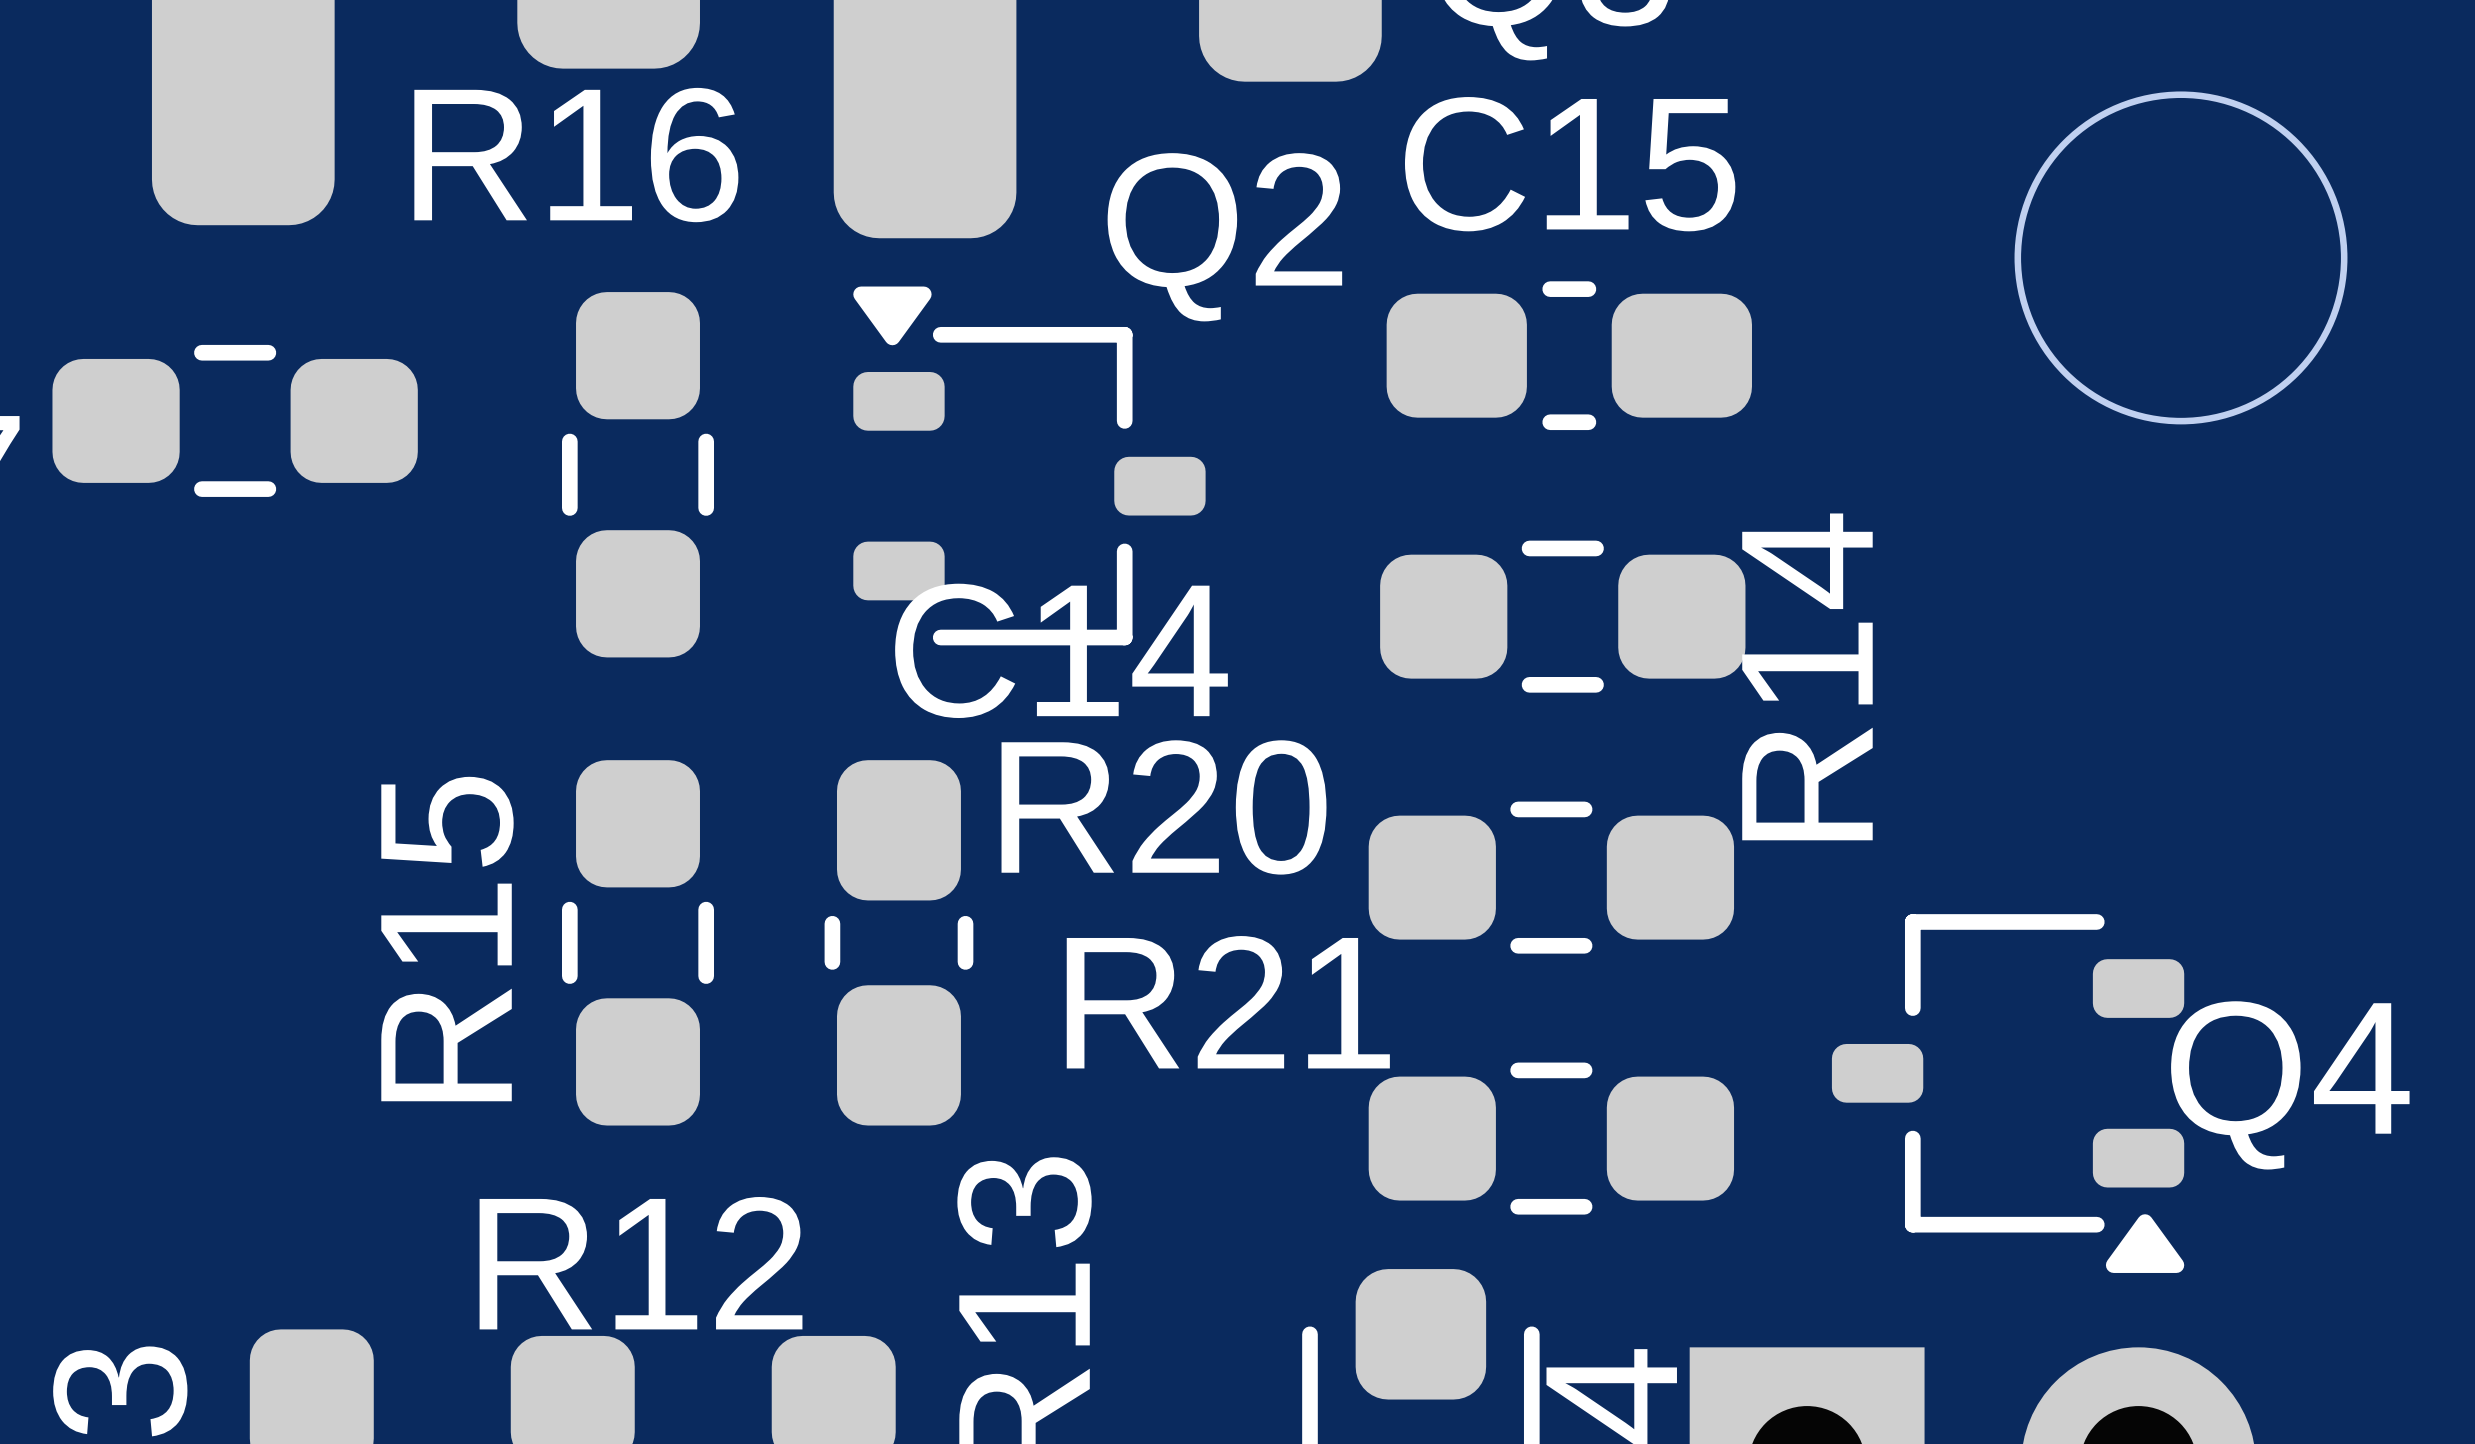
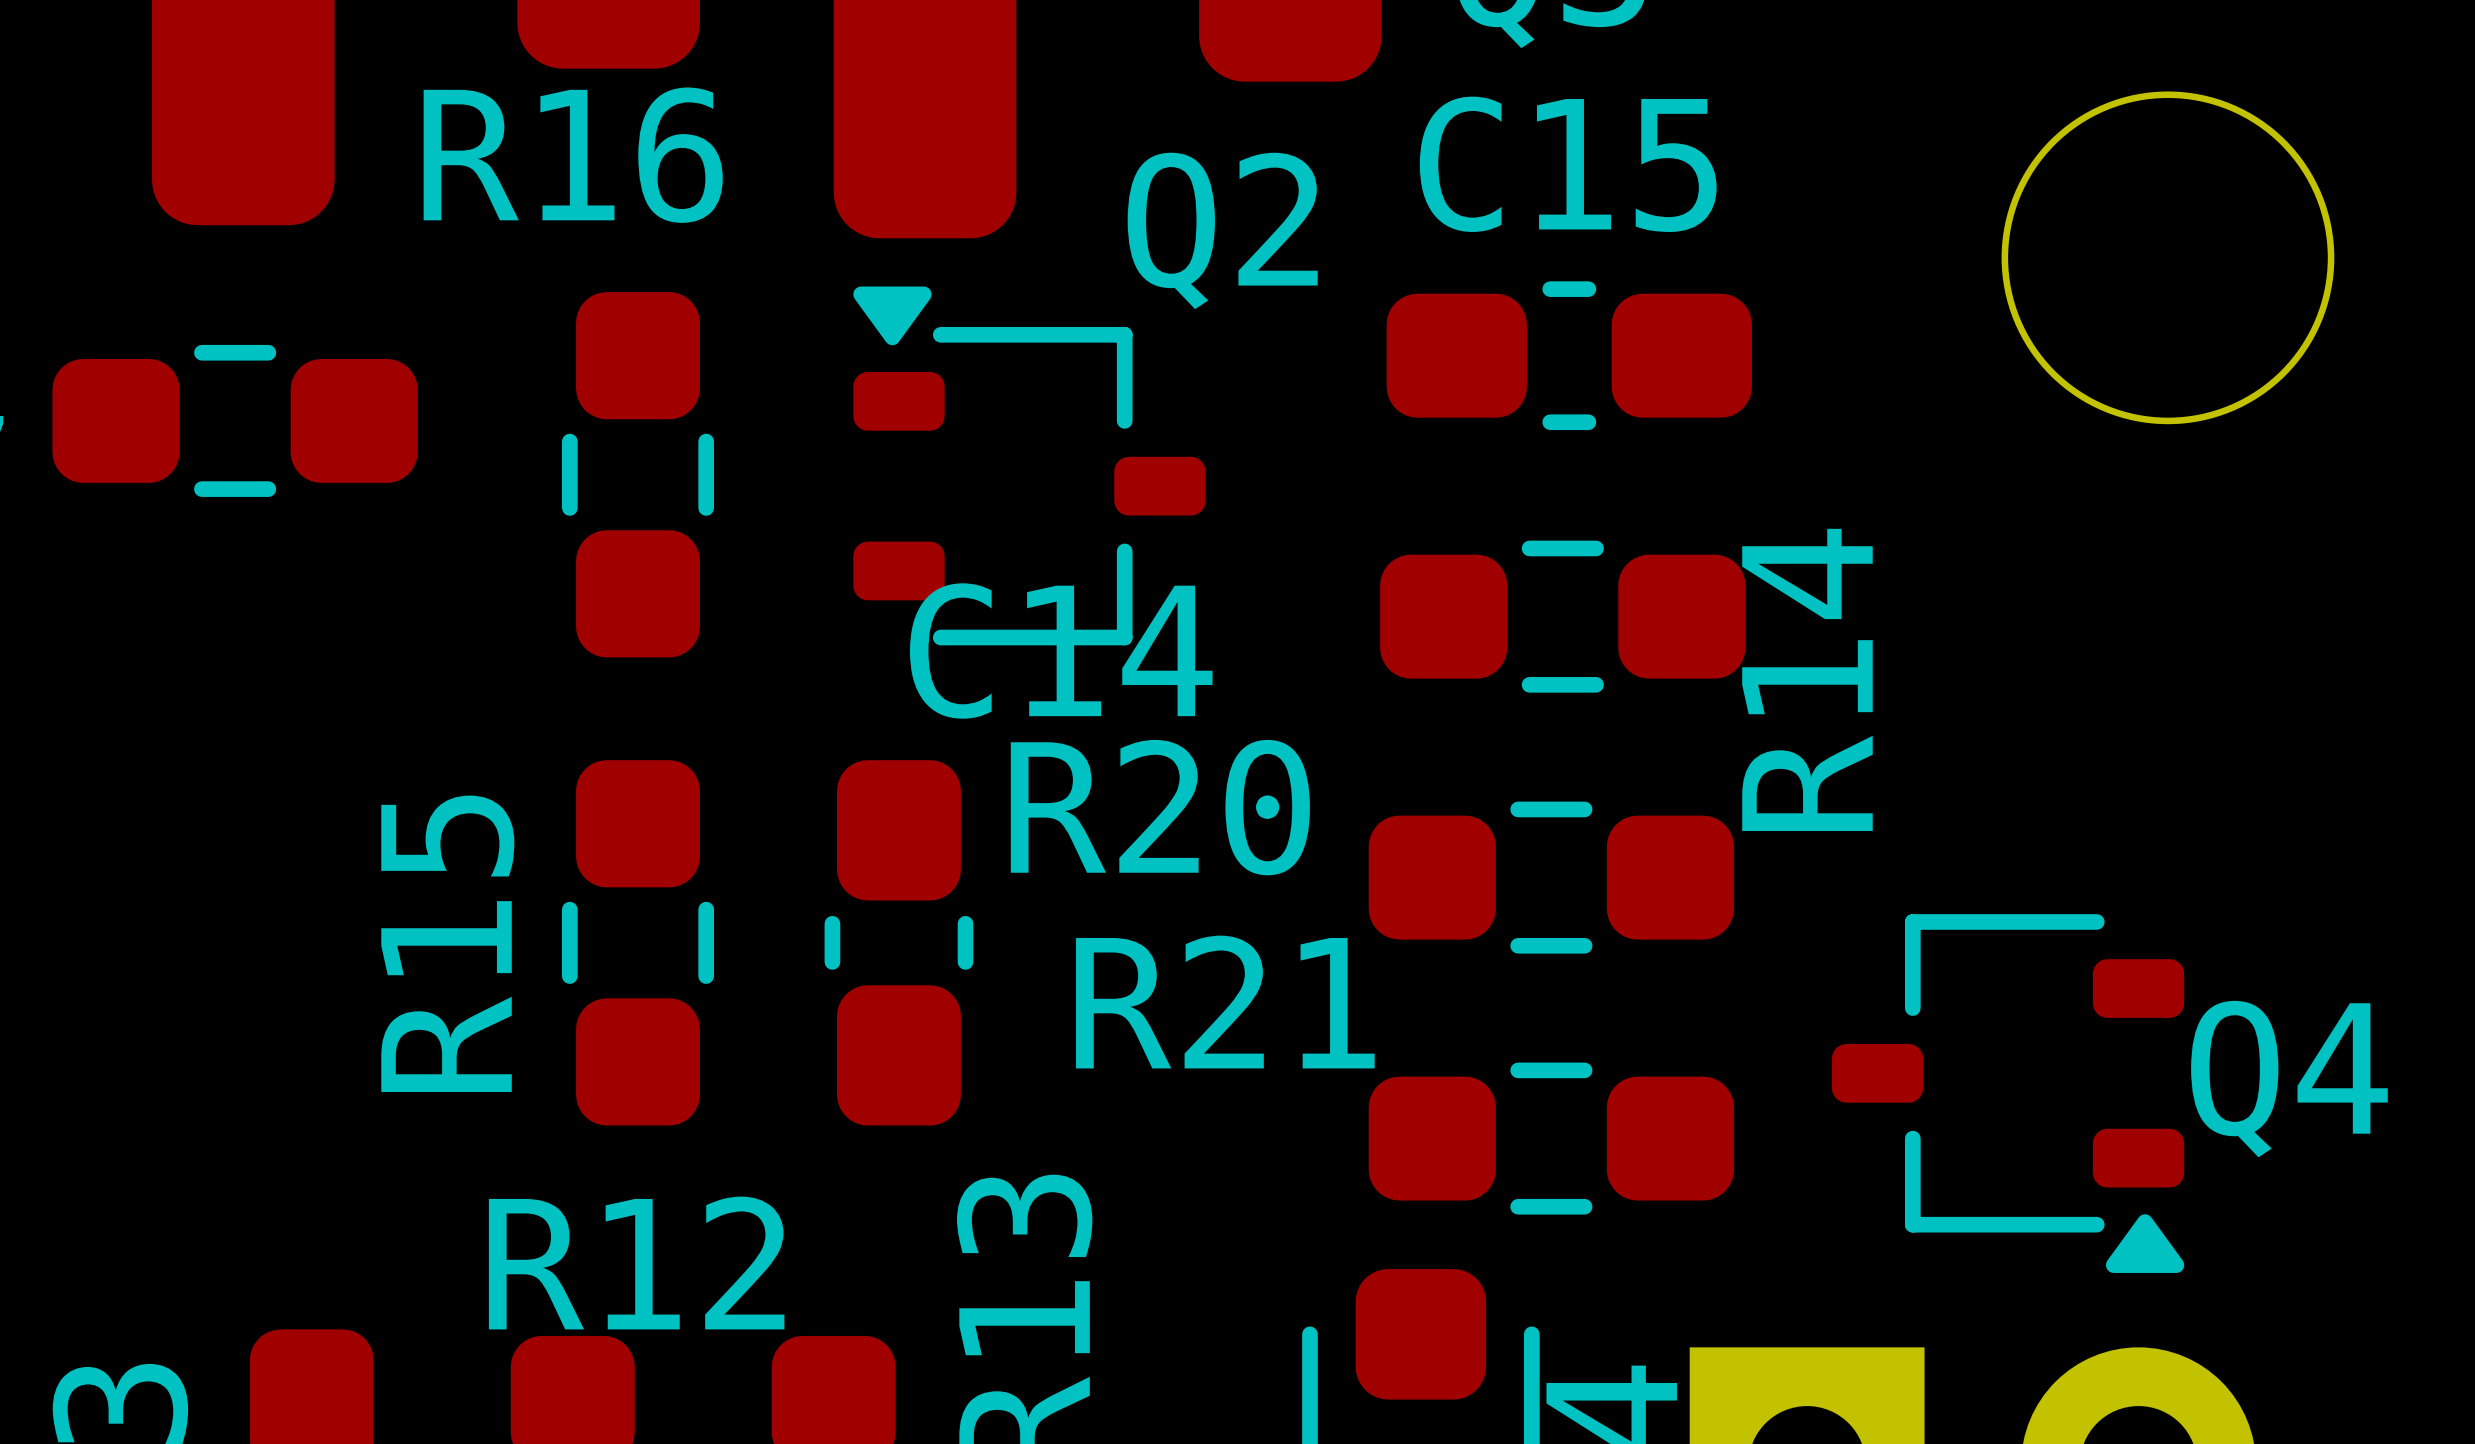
round board edge position: (2181, 257) -> (2167, 257)

